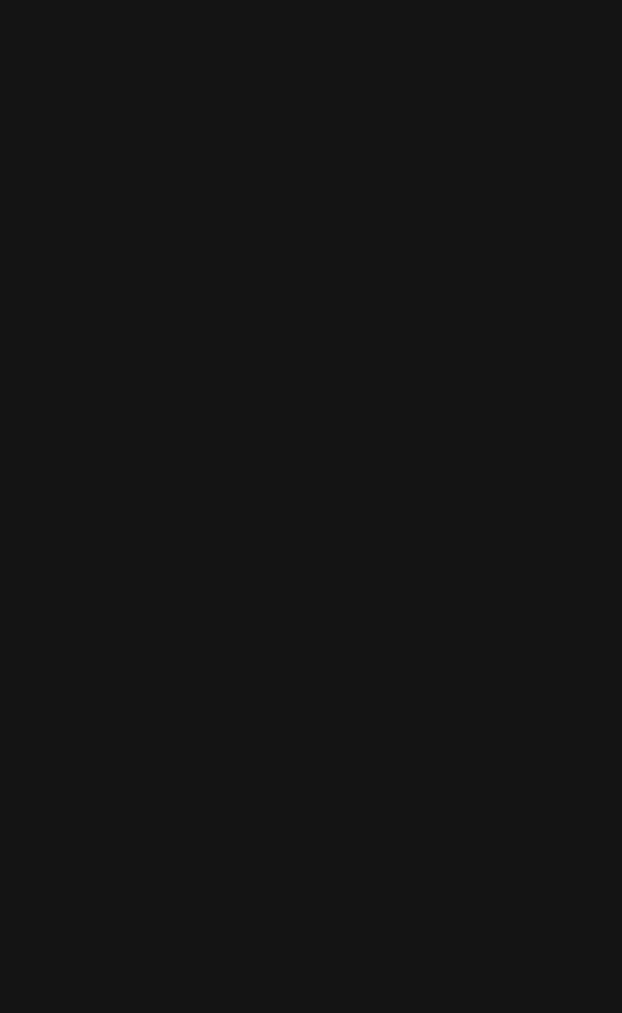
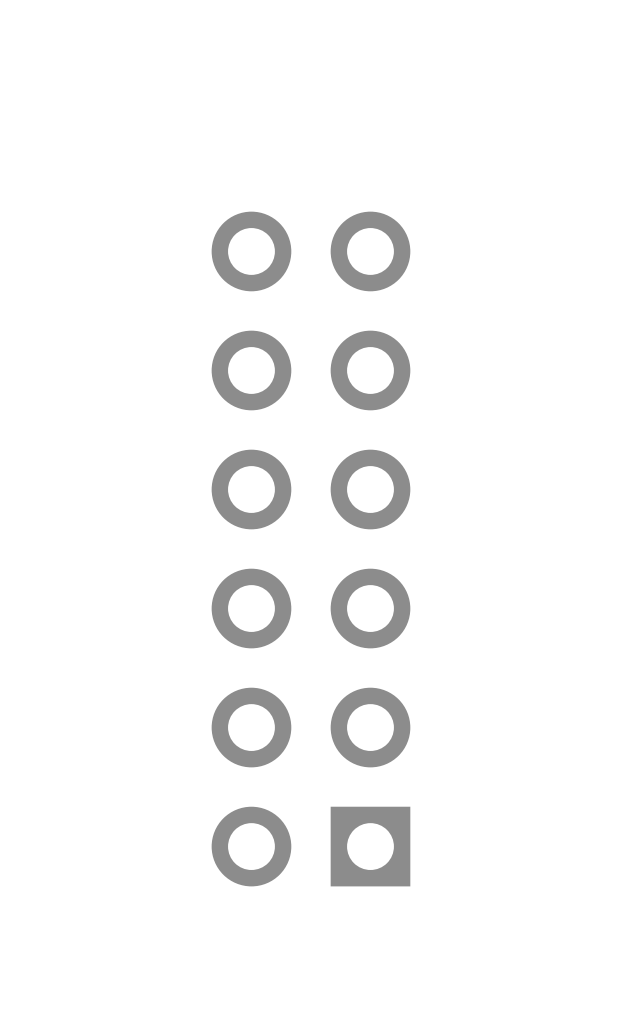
part: none -> (310, 549)

